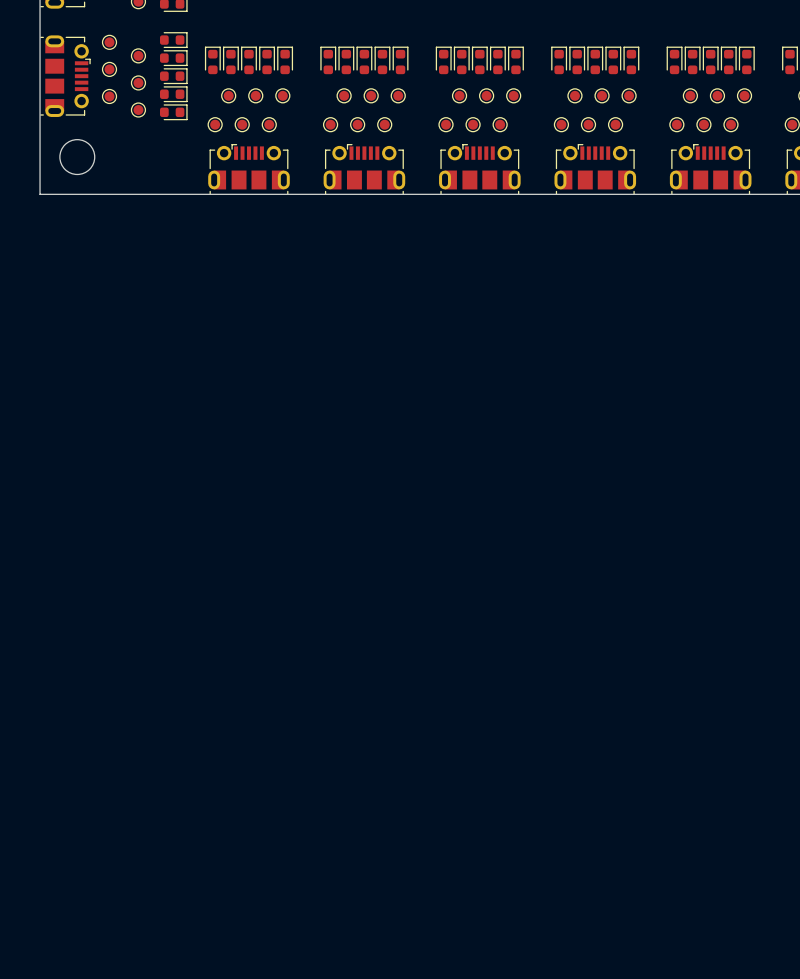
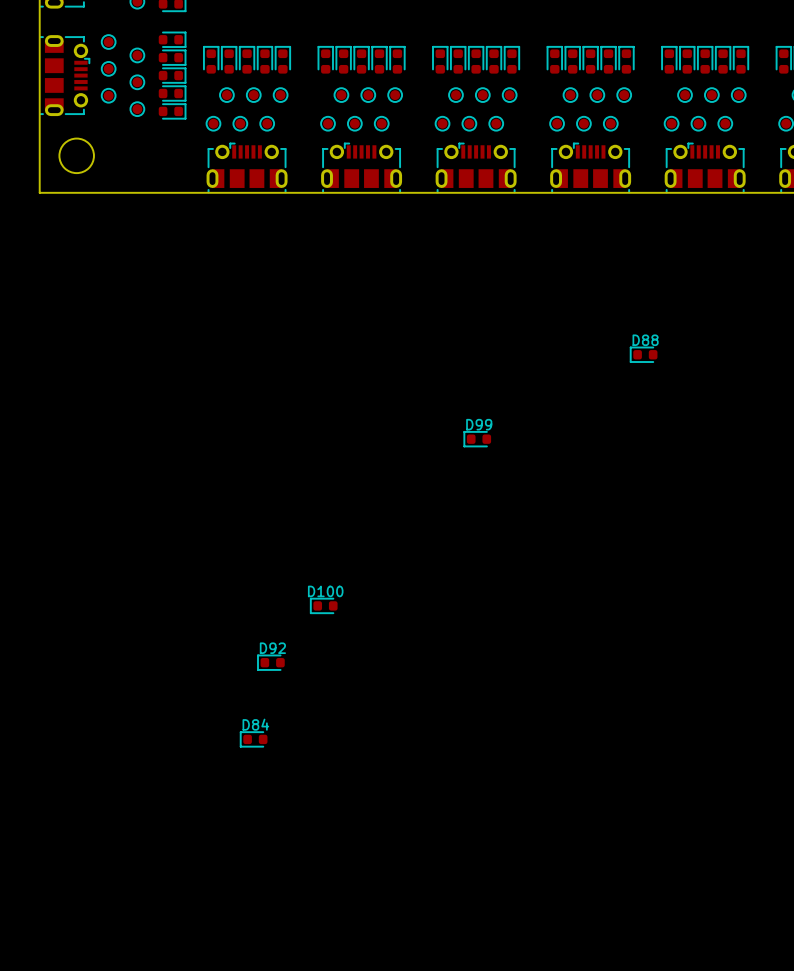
D88: none -> (643, 354)
D99: none -> (477, 439)
D100: none -> (323, 605)
D92: none -> (271, 662)
D84: none -> (253, 739)

